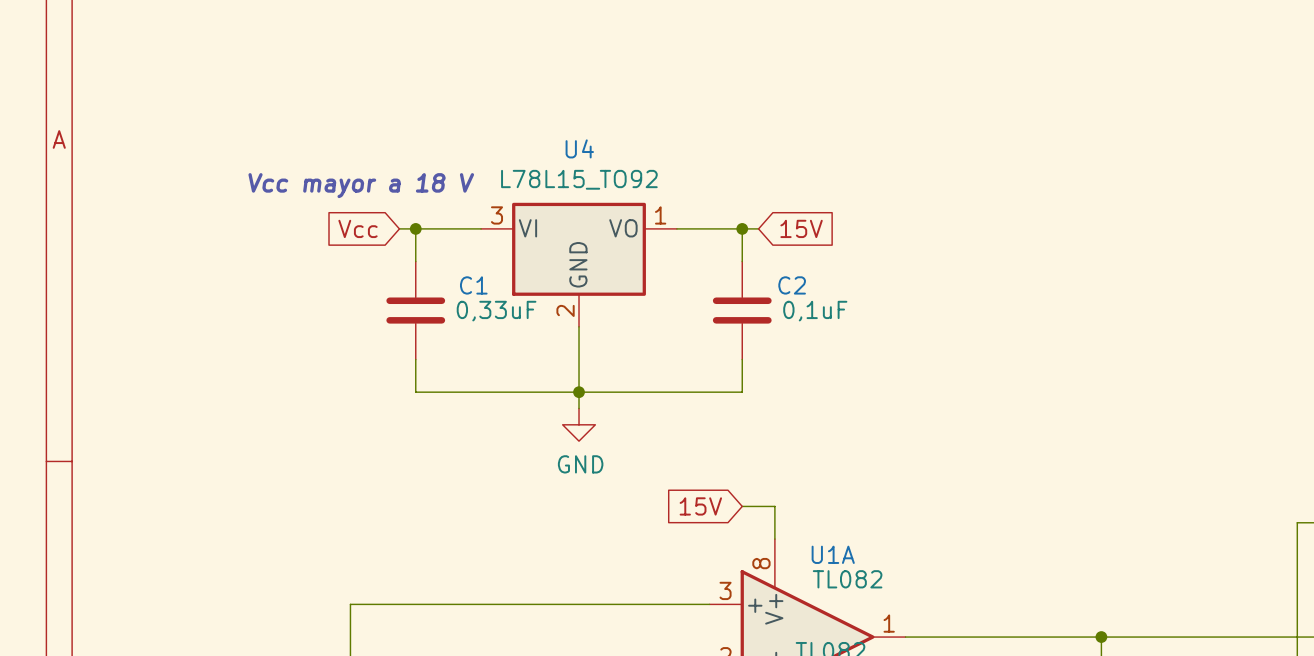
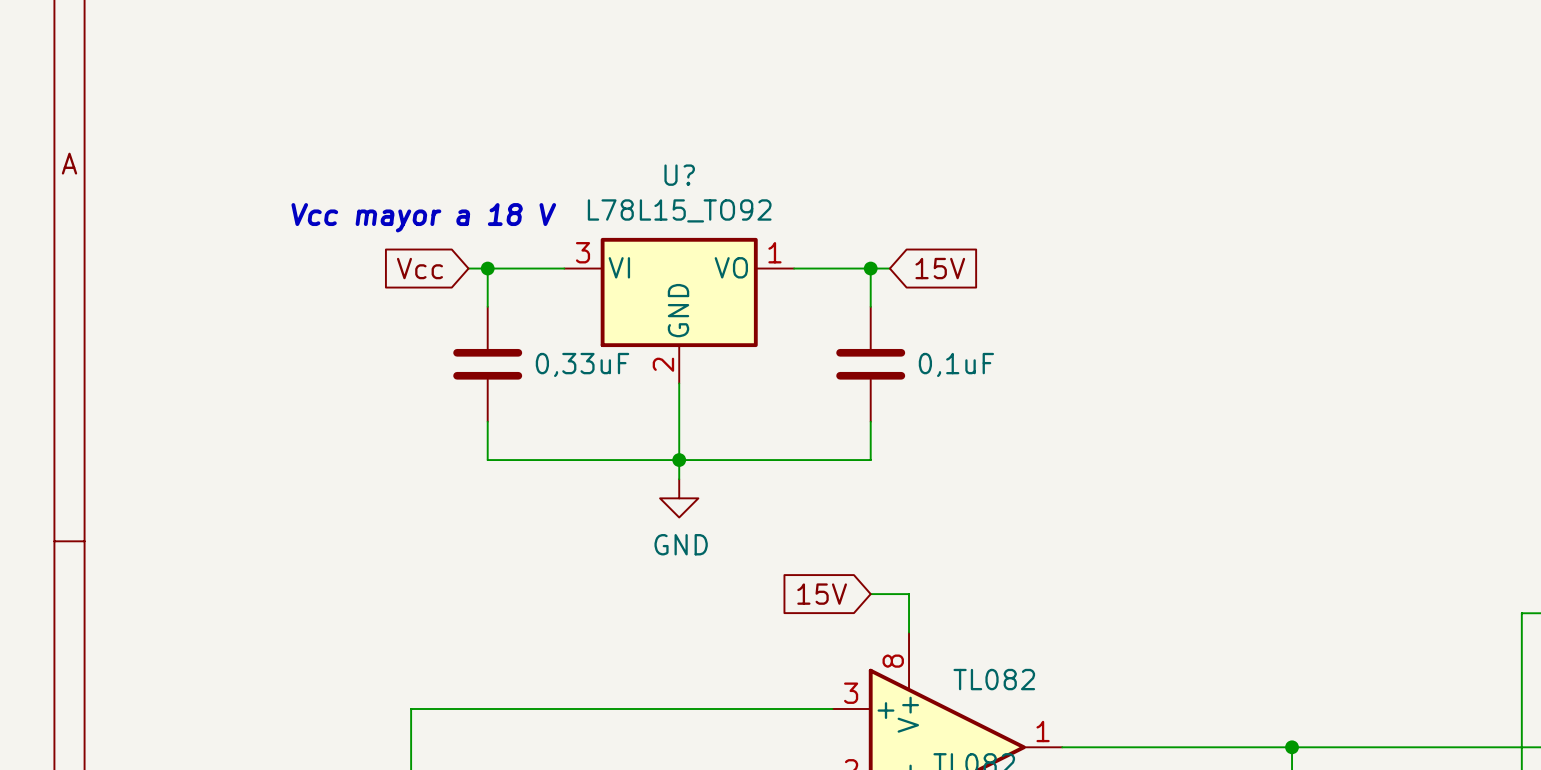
U4 name: U4 (579, 148) -> U? (679, 175)
C1 name: C1 (473, 285) -> none
C2 name: C2 (792, 285) -> none
U1A name: U1A (833, 554) -> none

